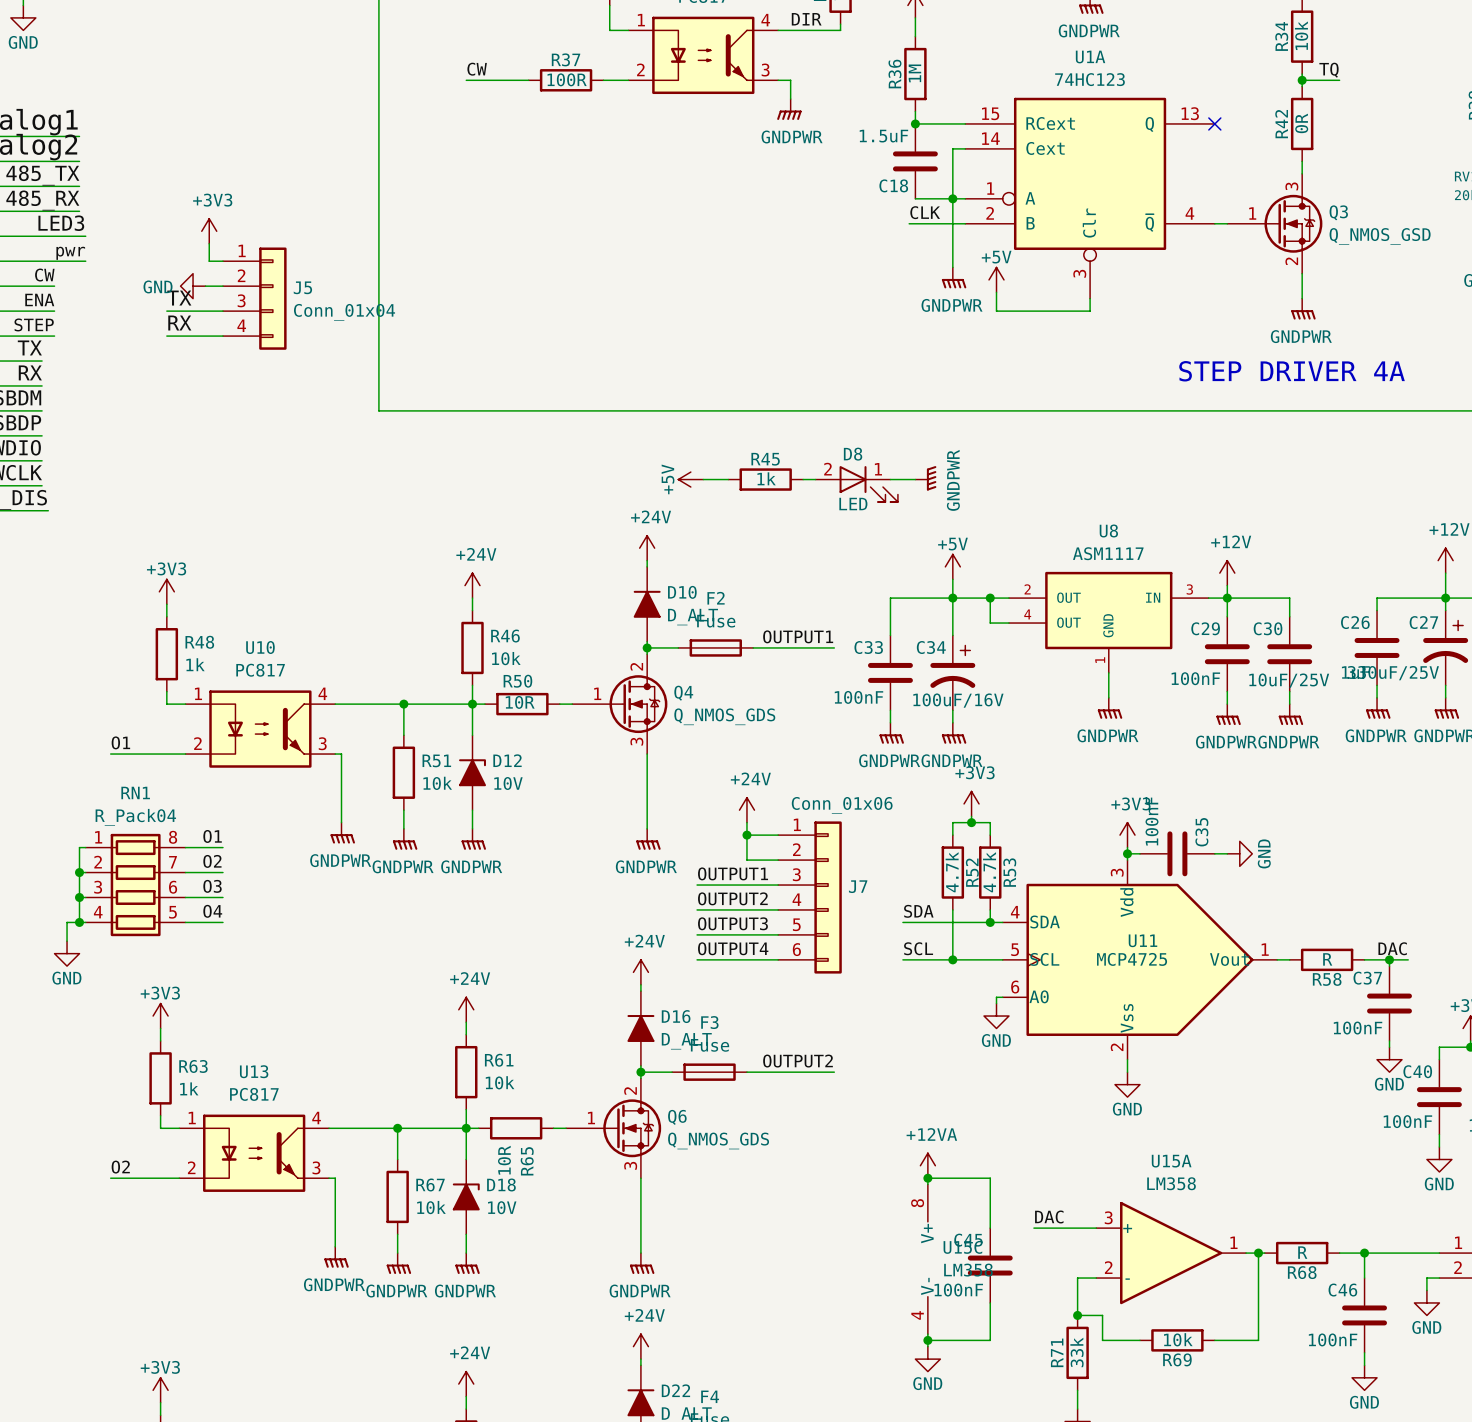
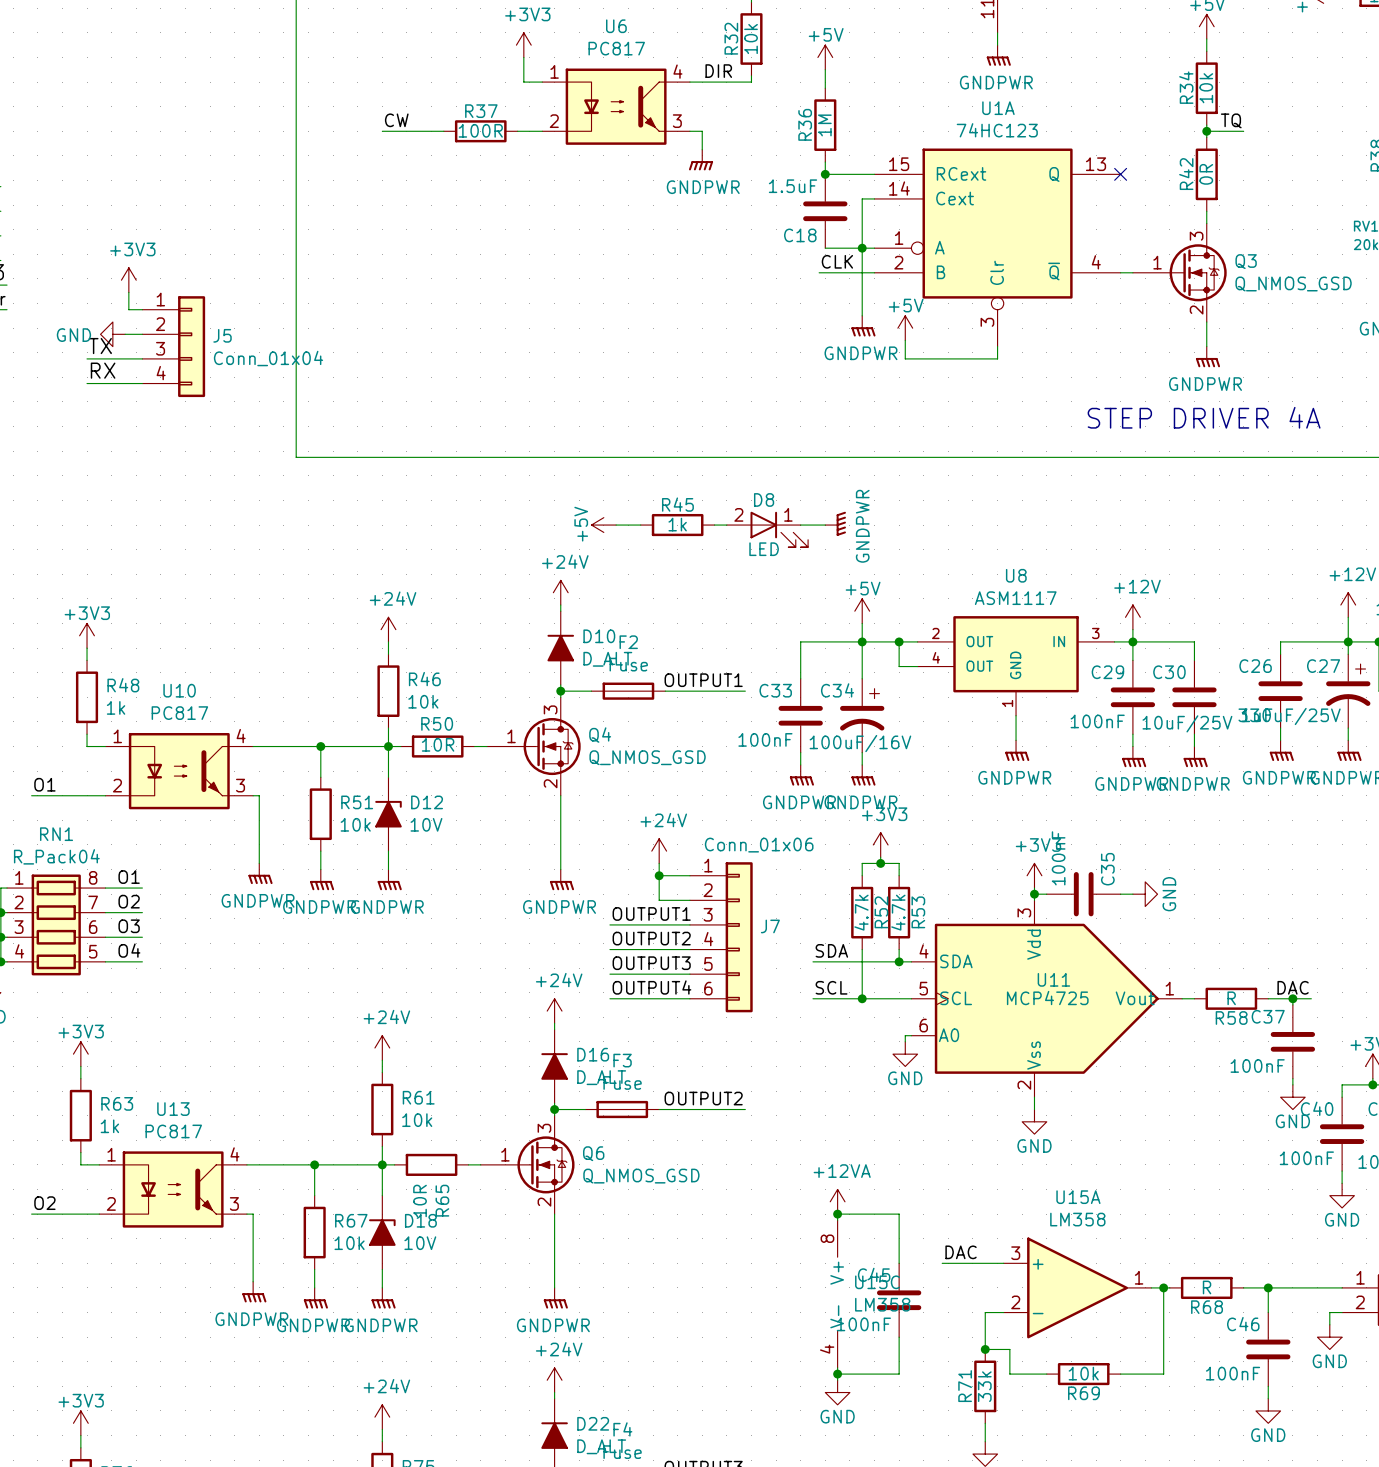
Q4 pin number: 2 (636, 666) -> 3 (550, 709)
Q4 value: Q_NMOS_GDS (724, 716) -> Q_NMOS_GSD (647, 757)
Q4 pin number: 3 (636, 741) -> 2 (550, 783)
Q6 pin number: 2 (630, 1090) -> 3 (544, 1128)
Q6 value: Q_NMOS_GDS (718, 1140) -> Q_NMOS_GSD (641, 1176)
Q6 pin number: 3 (630, 1165) -> 2 (544, 1202)

